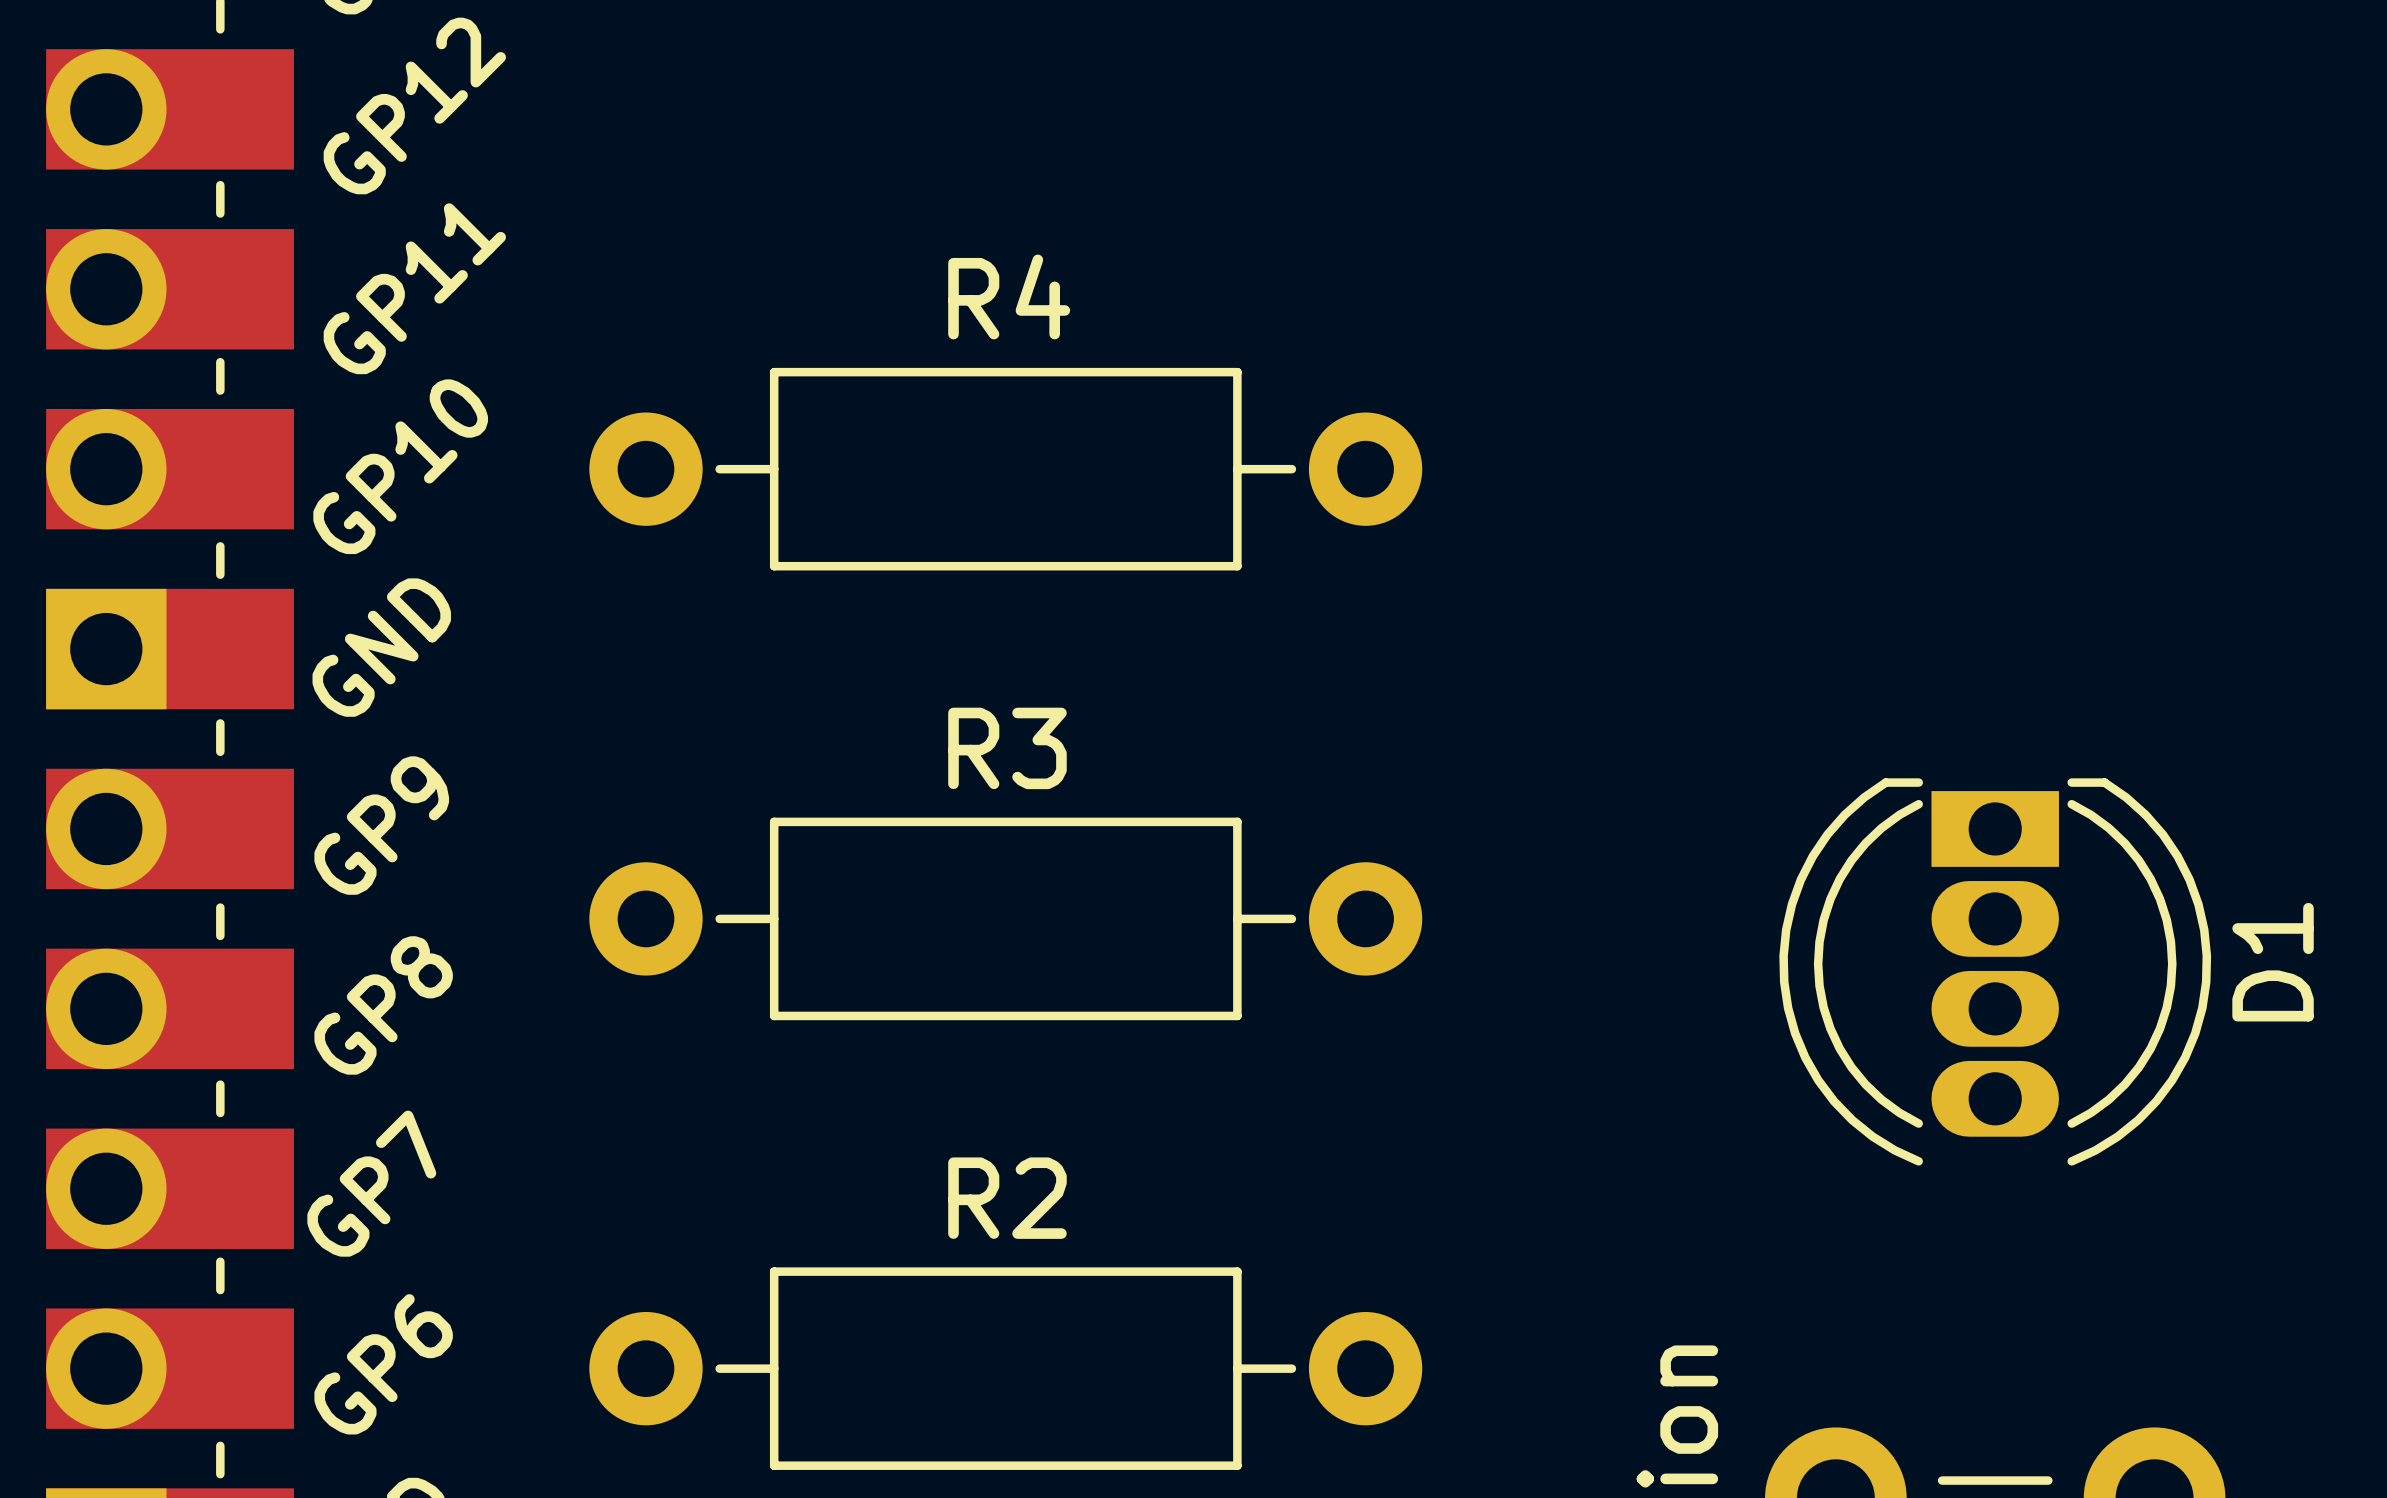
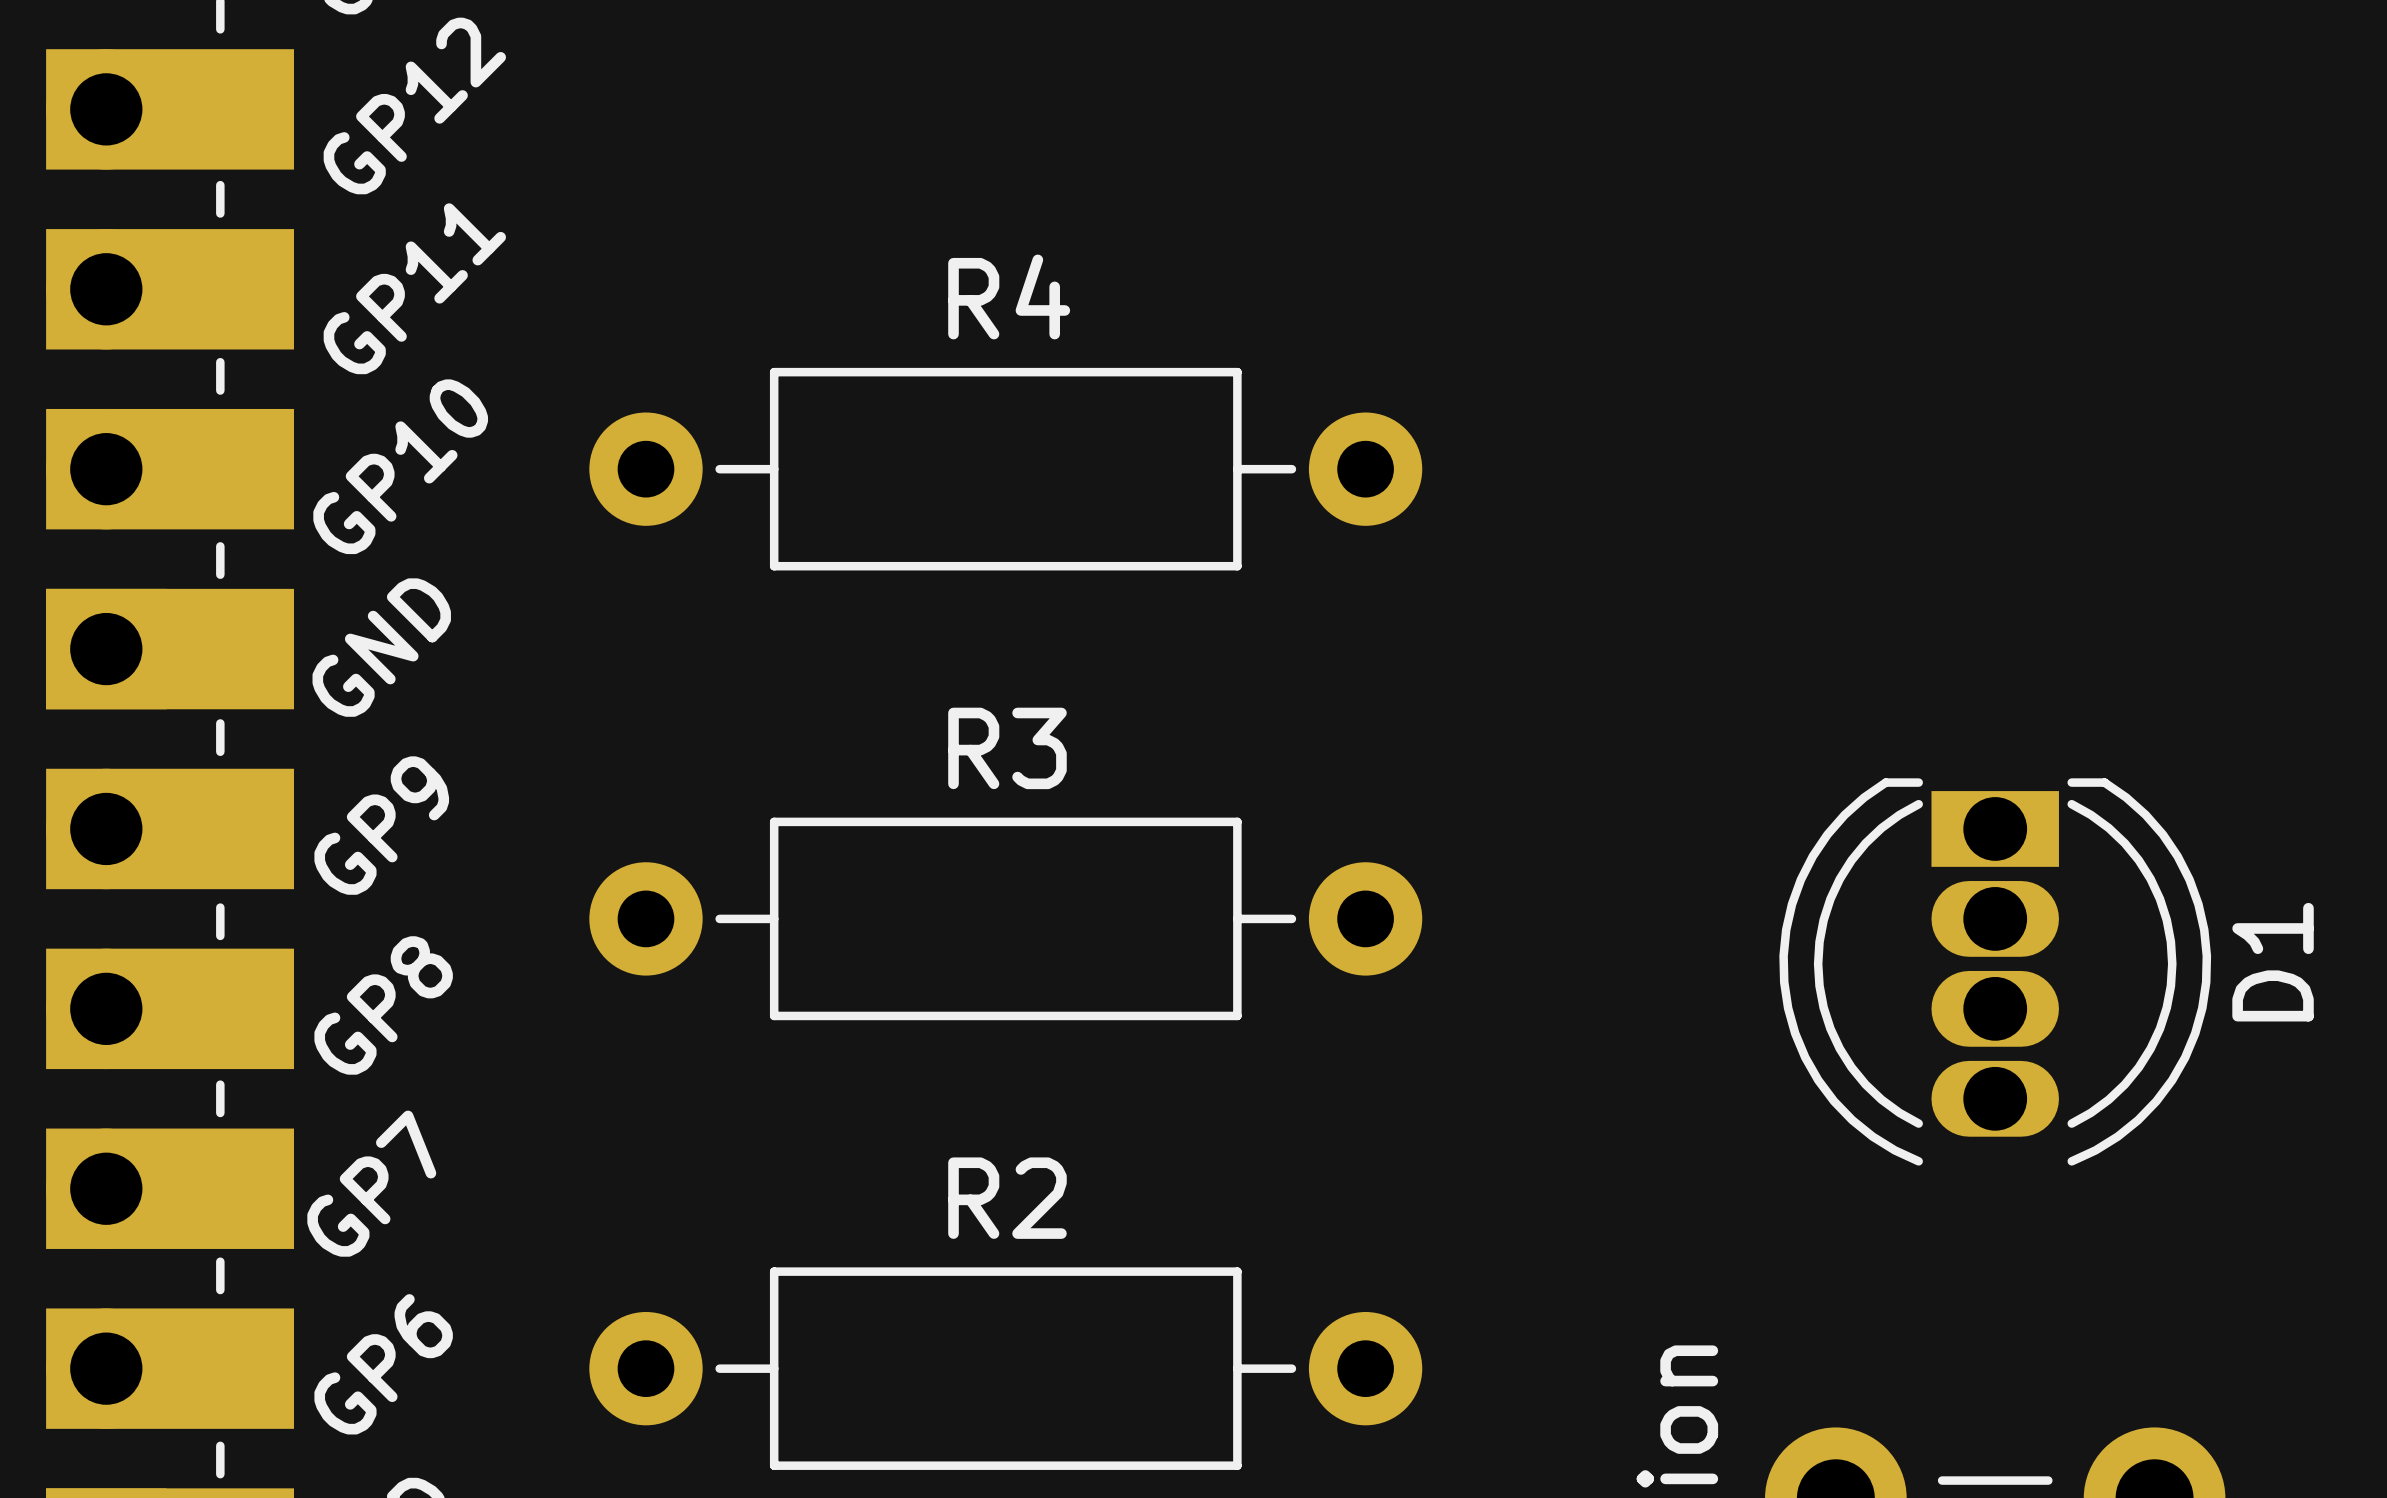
D1 footprint: [1779, 778, 2212, 1166] -> [1779, 778, 2212, 1166]

